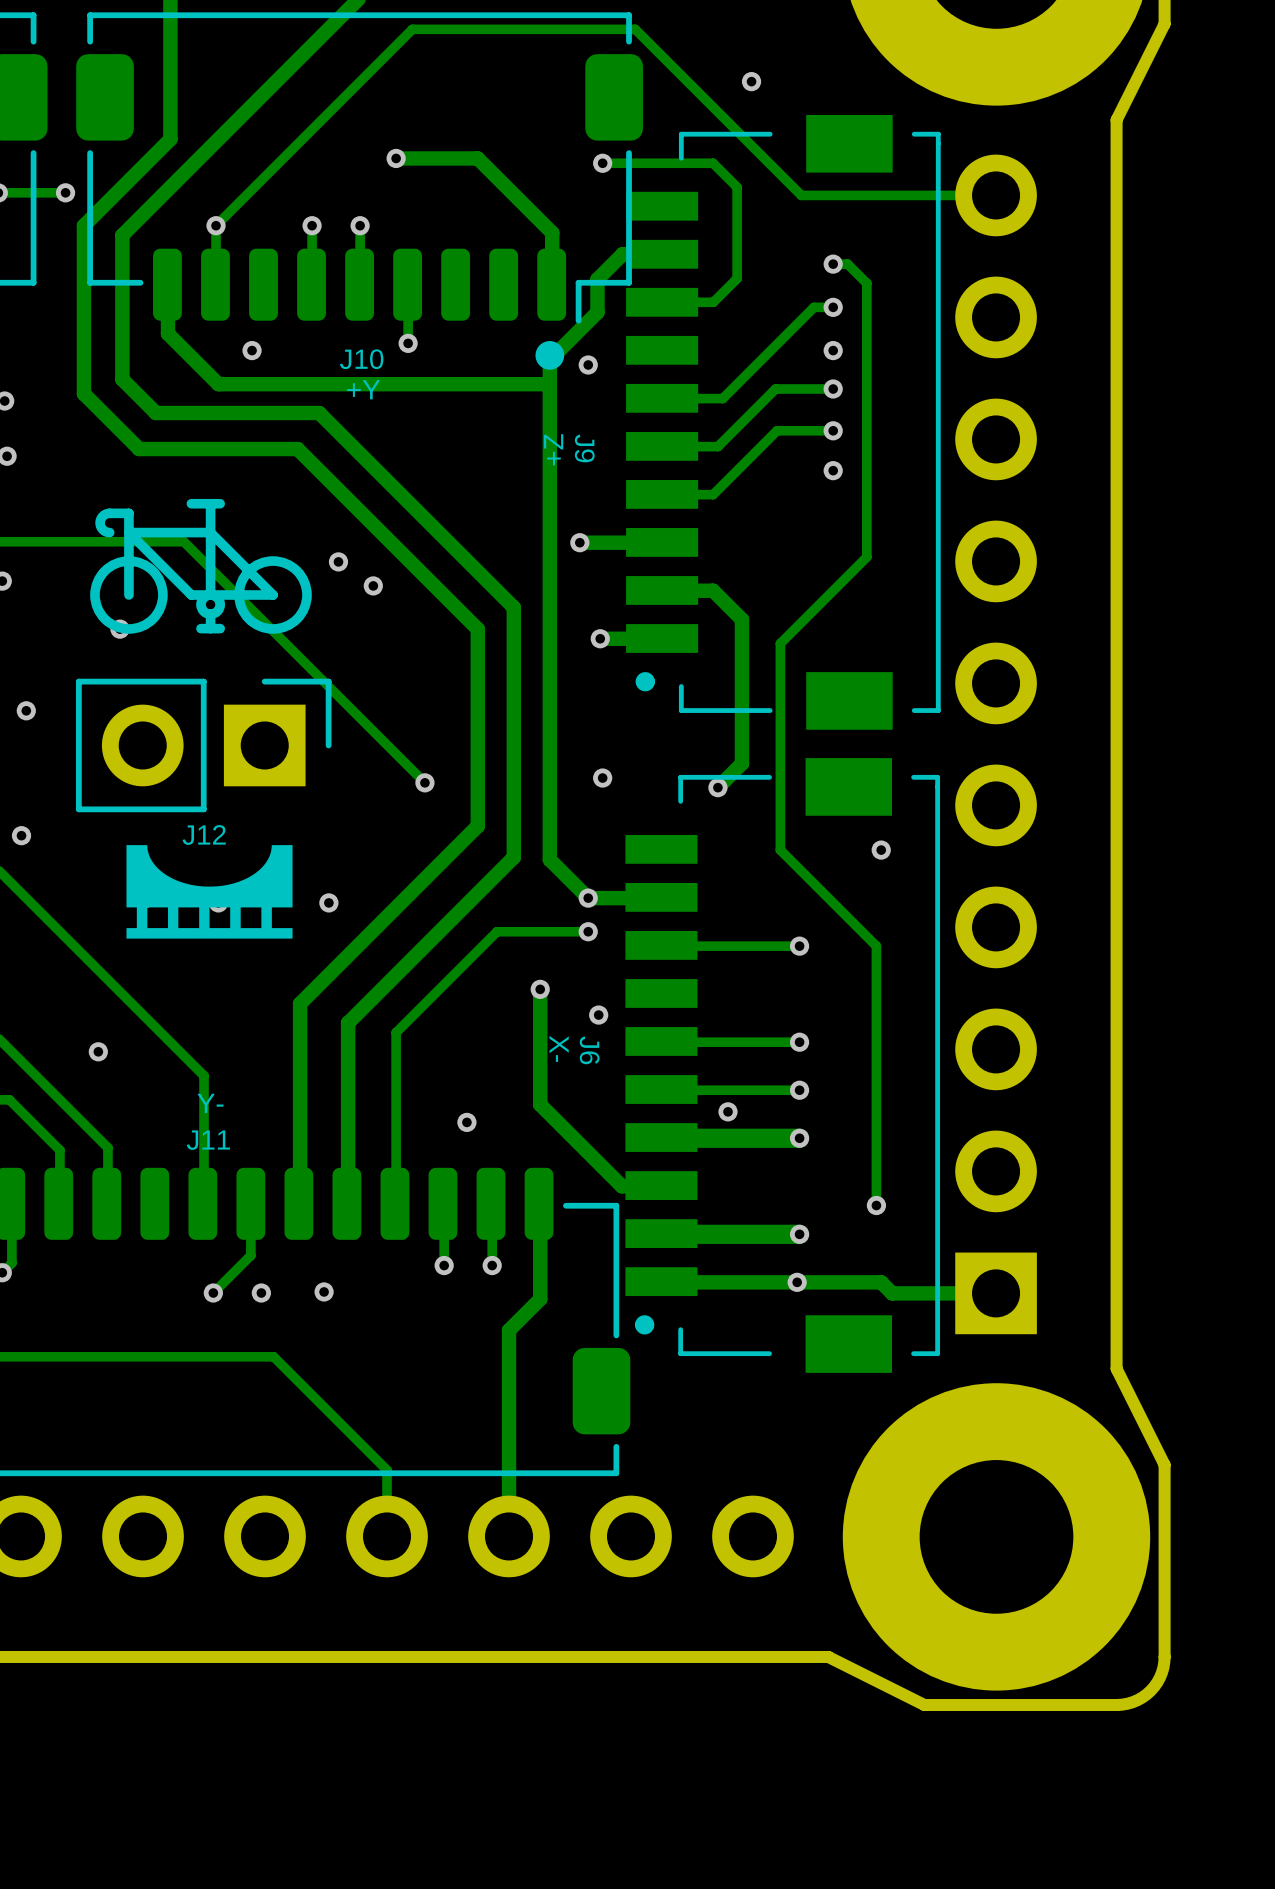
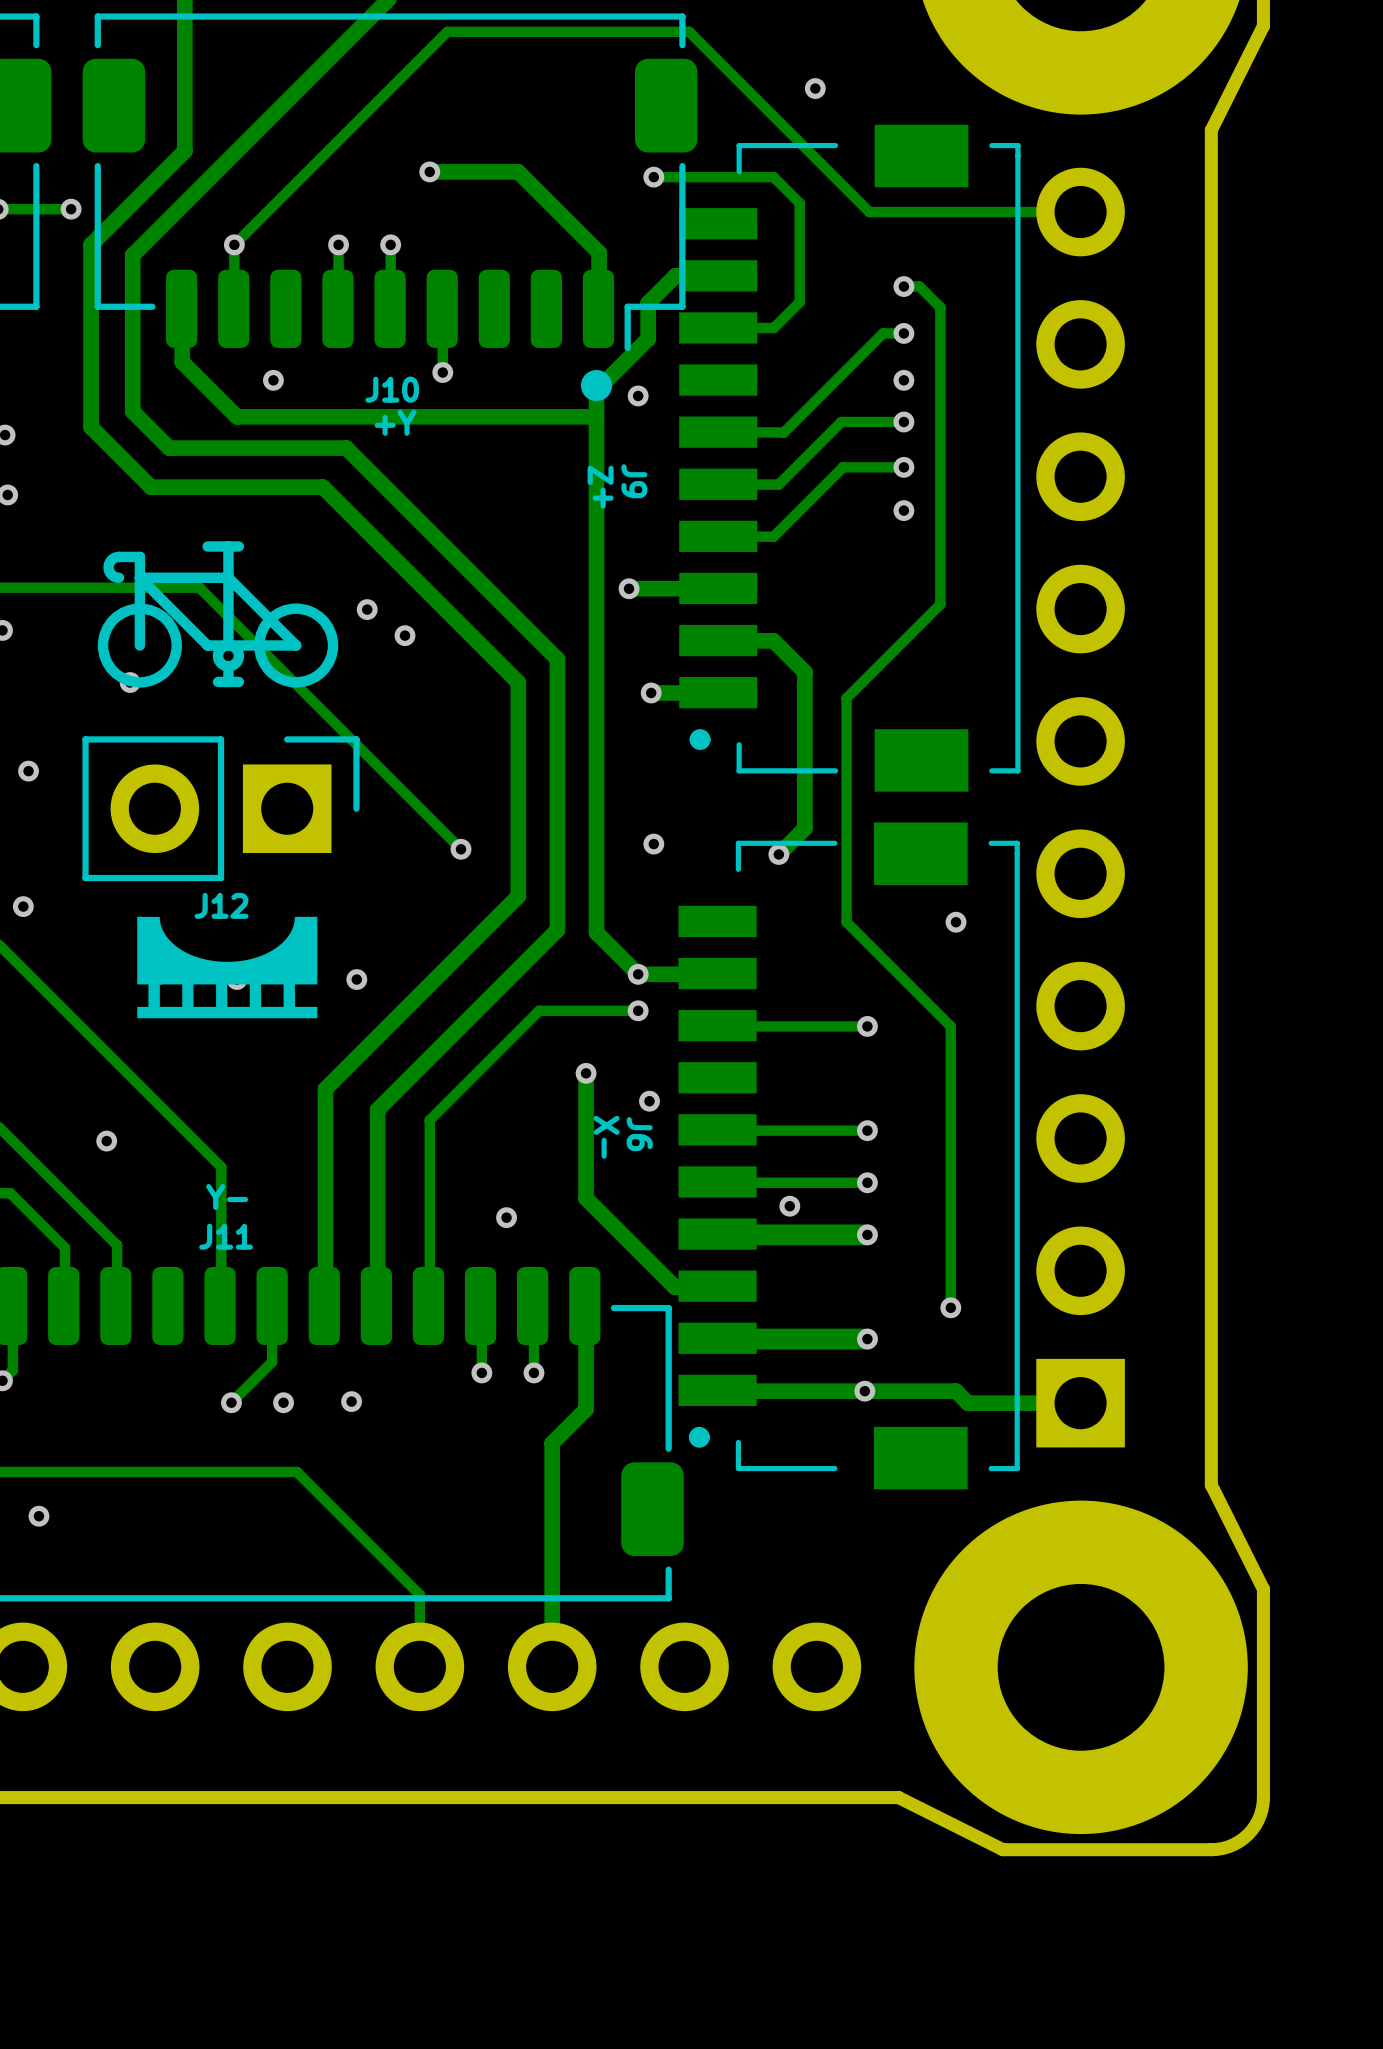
via: none -> (38, 1516)

